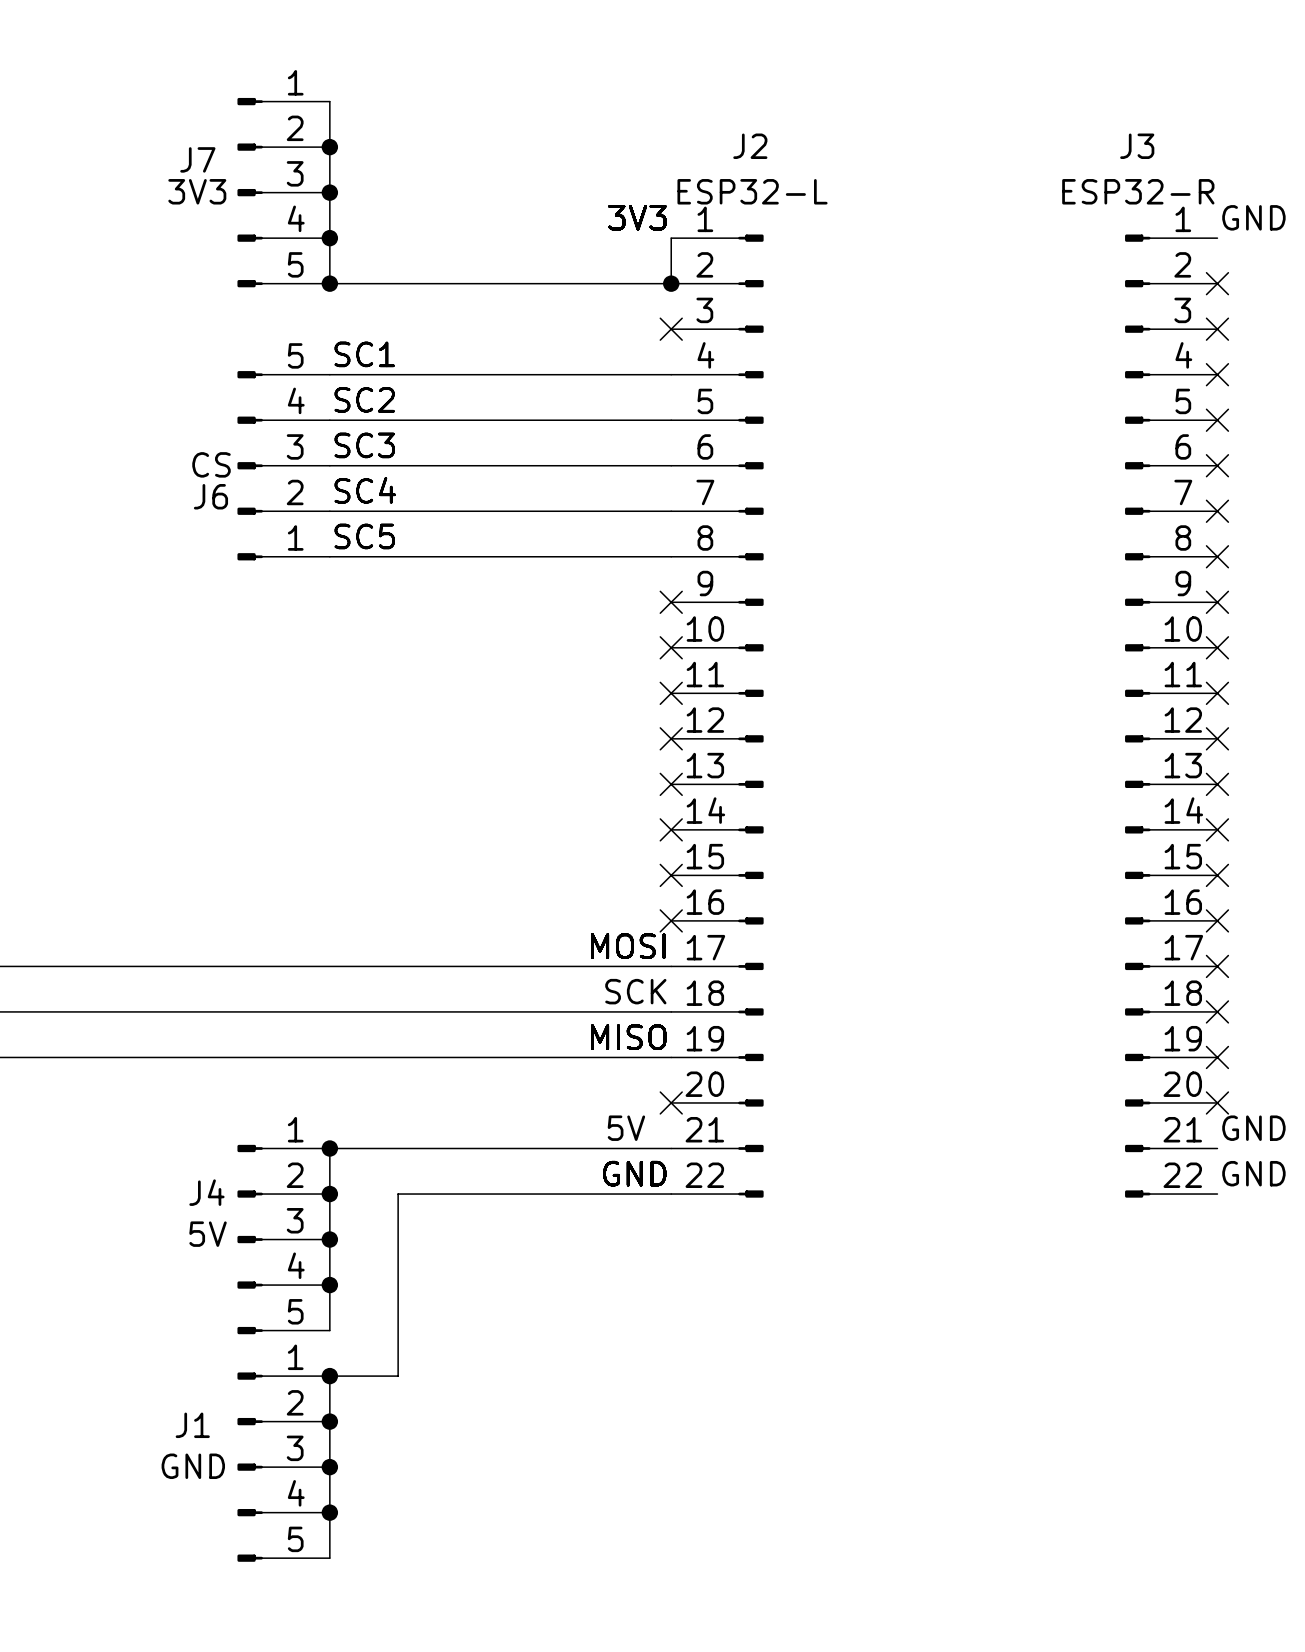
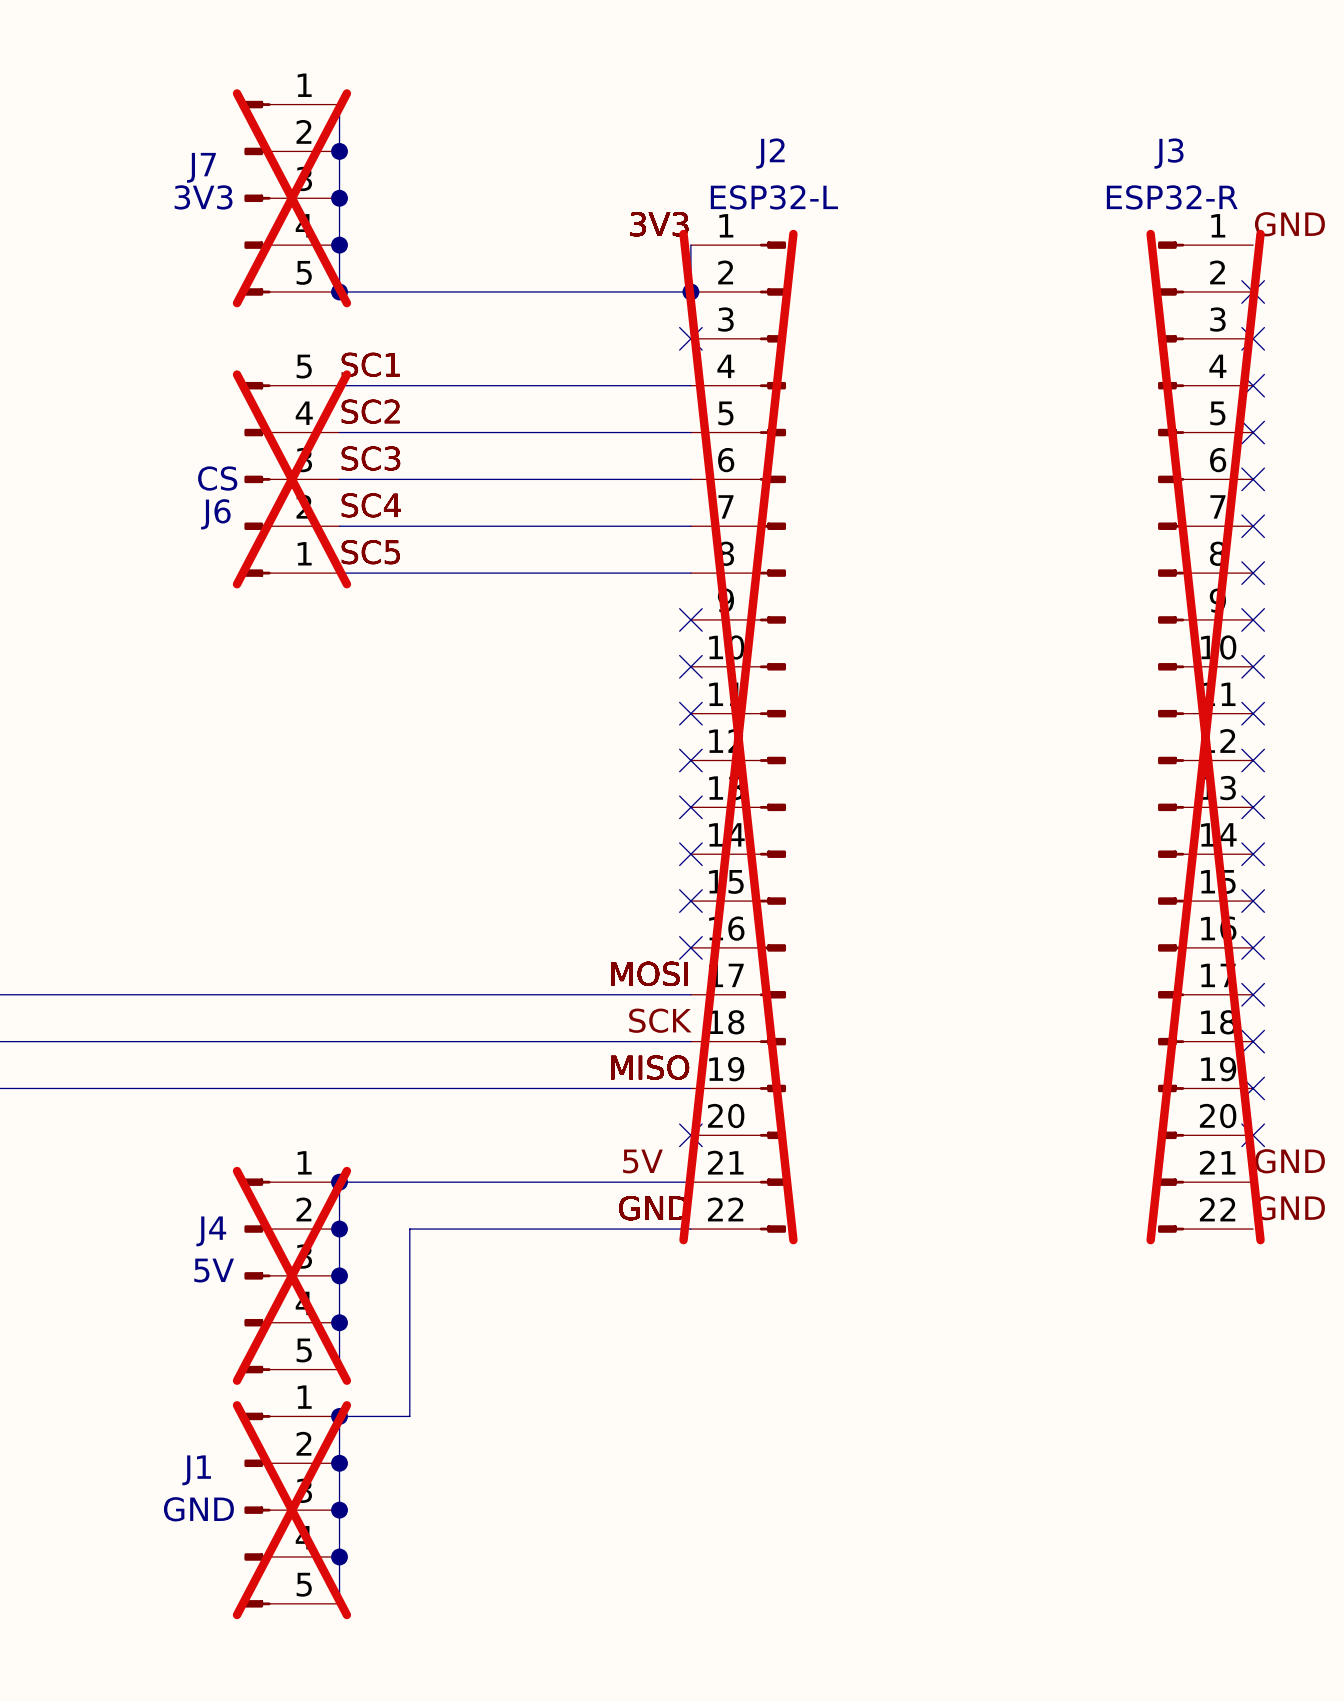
J7 do-not-place cross: none -> (291, 198)
J6 do-not-place cross: none -> (291, 479)
J2 do-not-place cross: none -> (738, 737)
J3 do-not-place cross: none -> (1205, 737)
J4 do-not-place cross: none -> (291, 1275)
J1 do-not-place cross: none -> (291, 1510)

